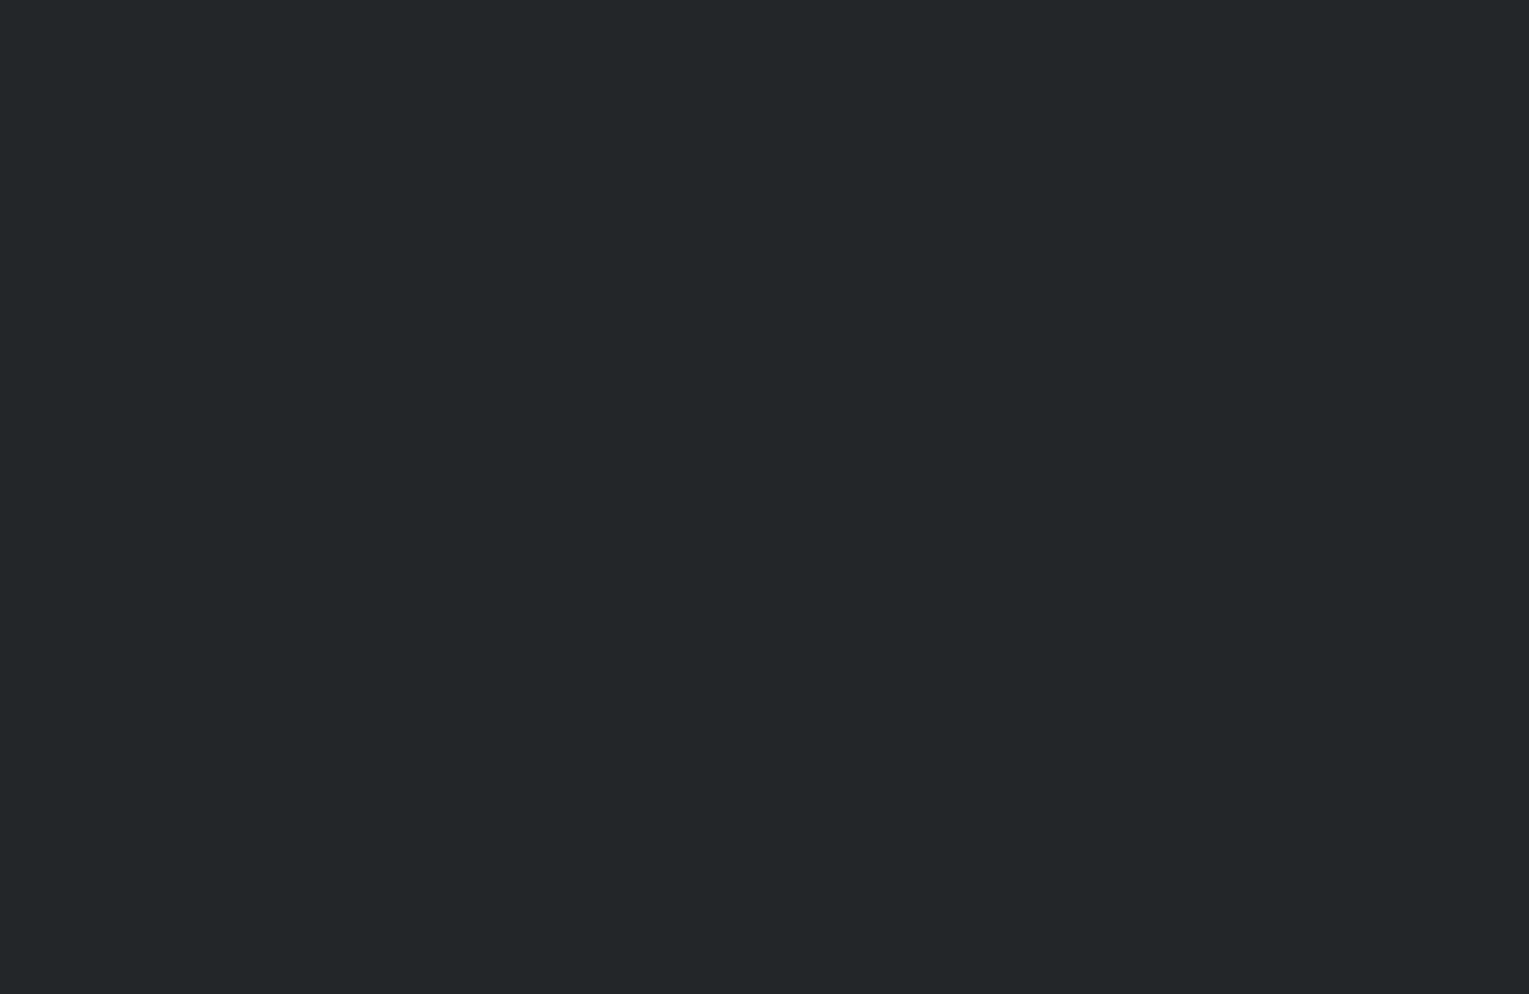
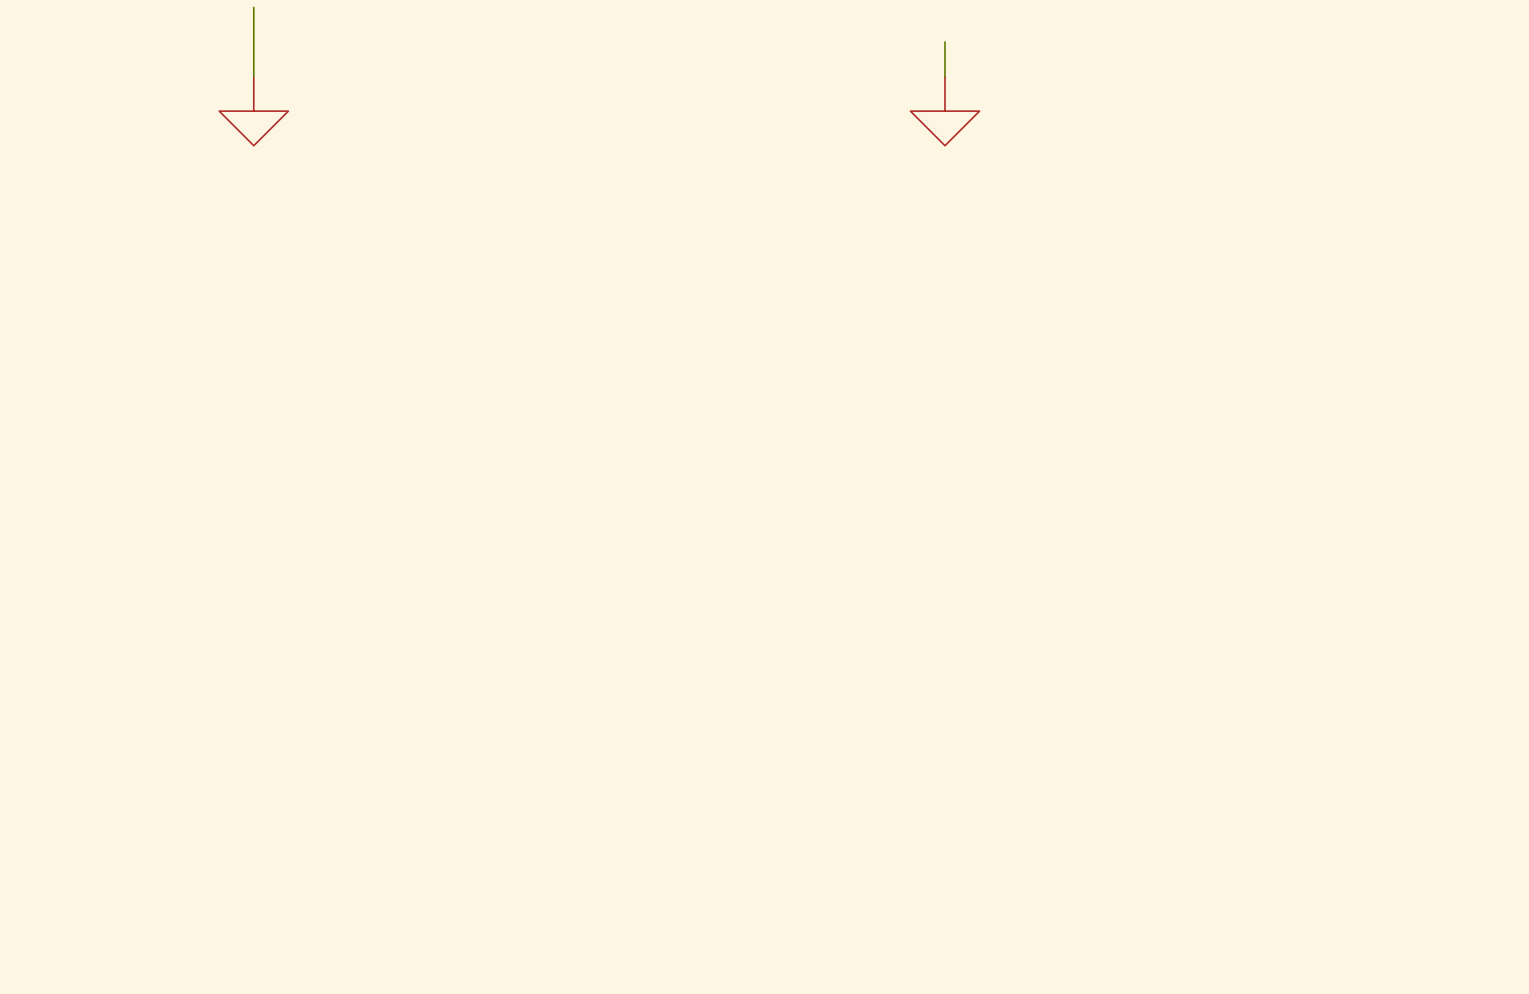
wire: none -> (253, 7) (253, 76)
wire: none -> (944, 42) (944, 76)
power symbol: none -> (253, 111)
power symbol: none -> (944, 111)

